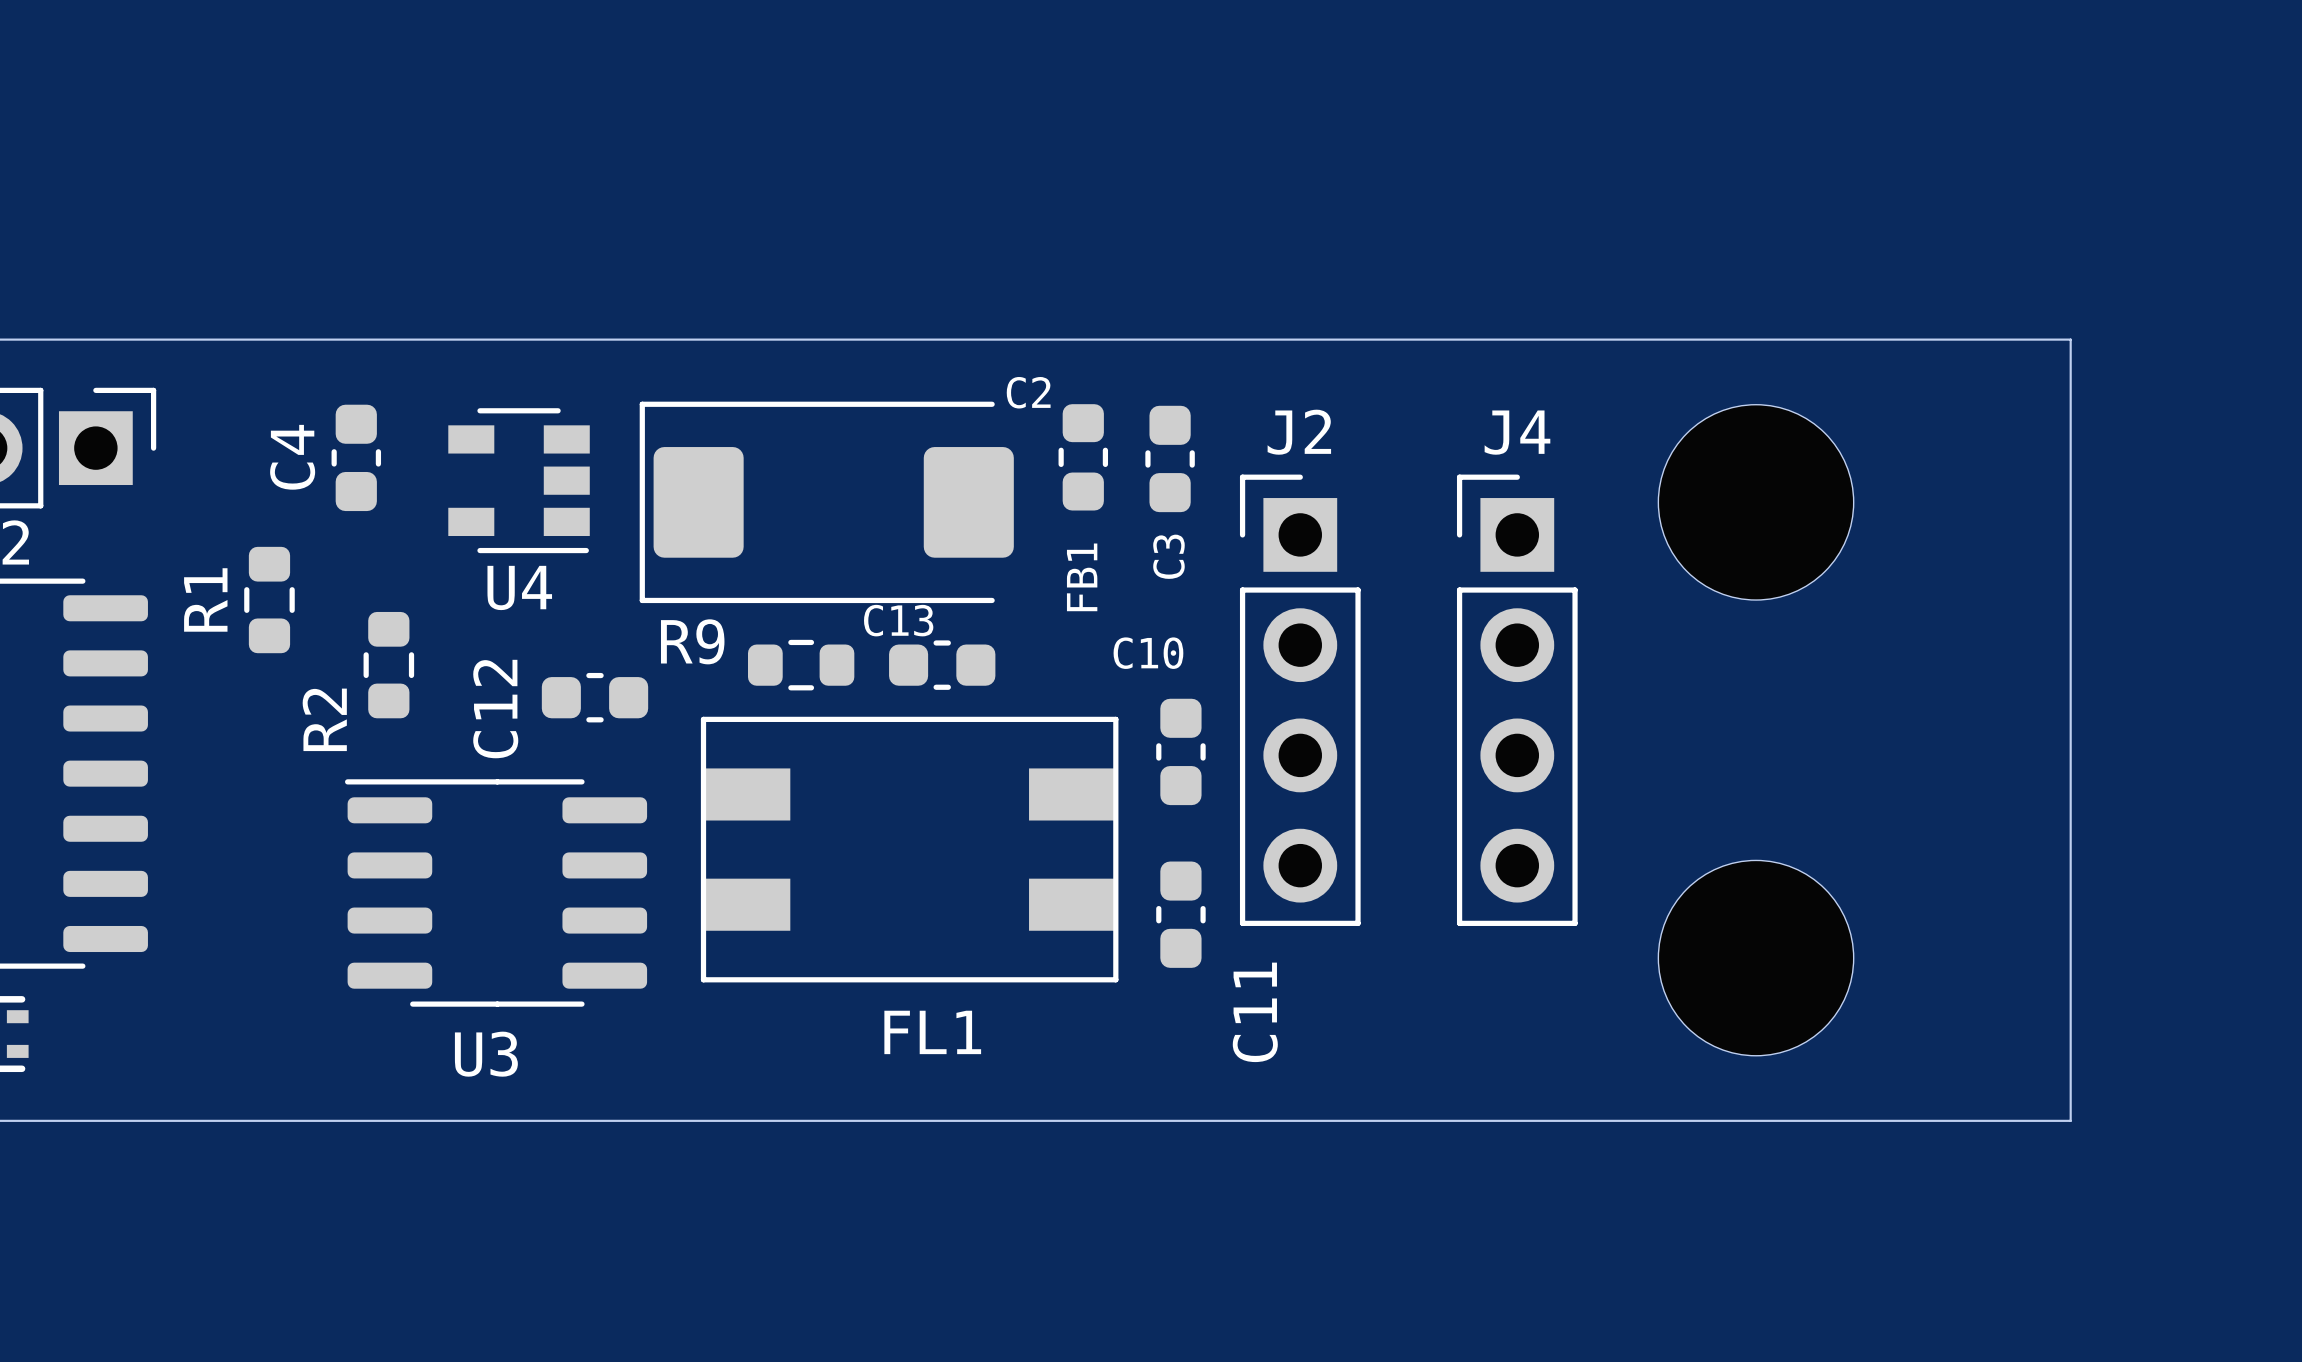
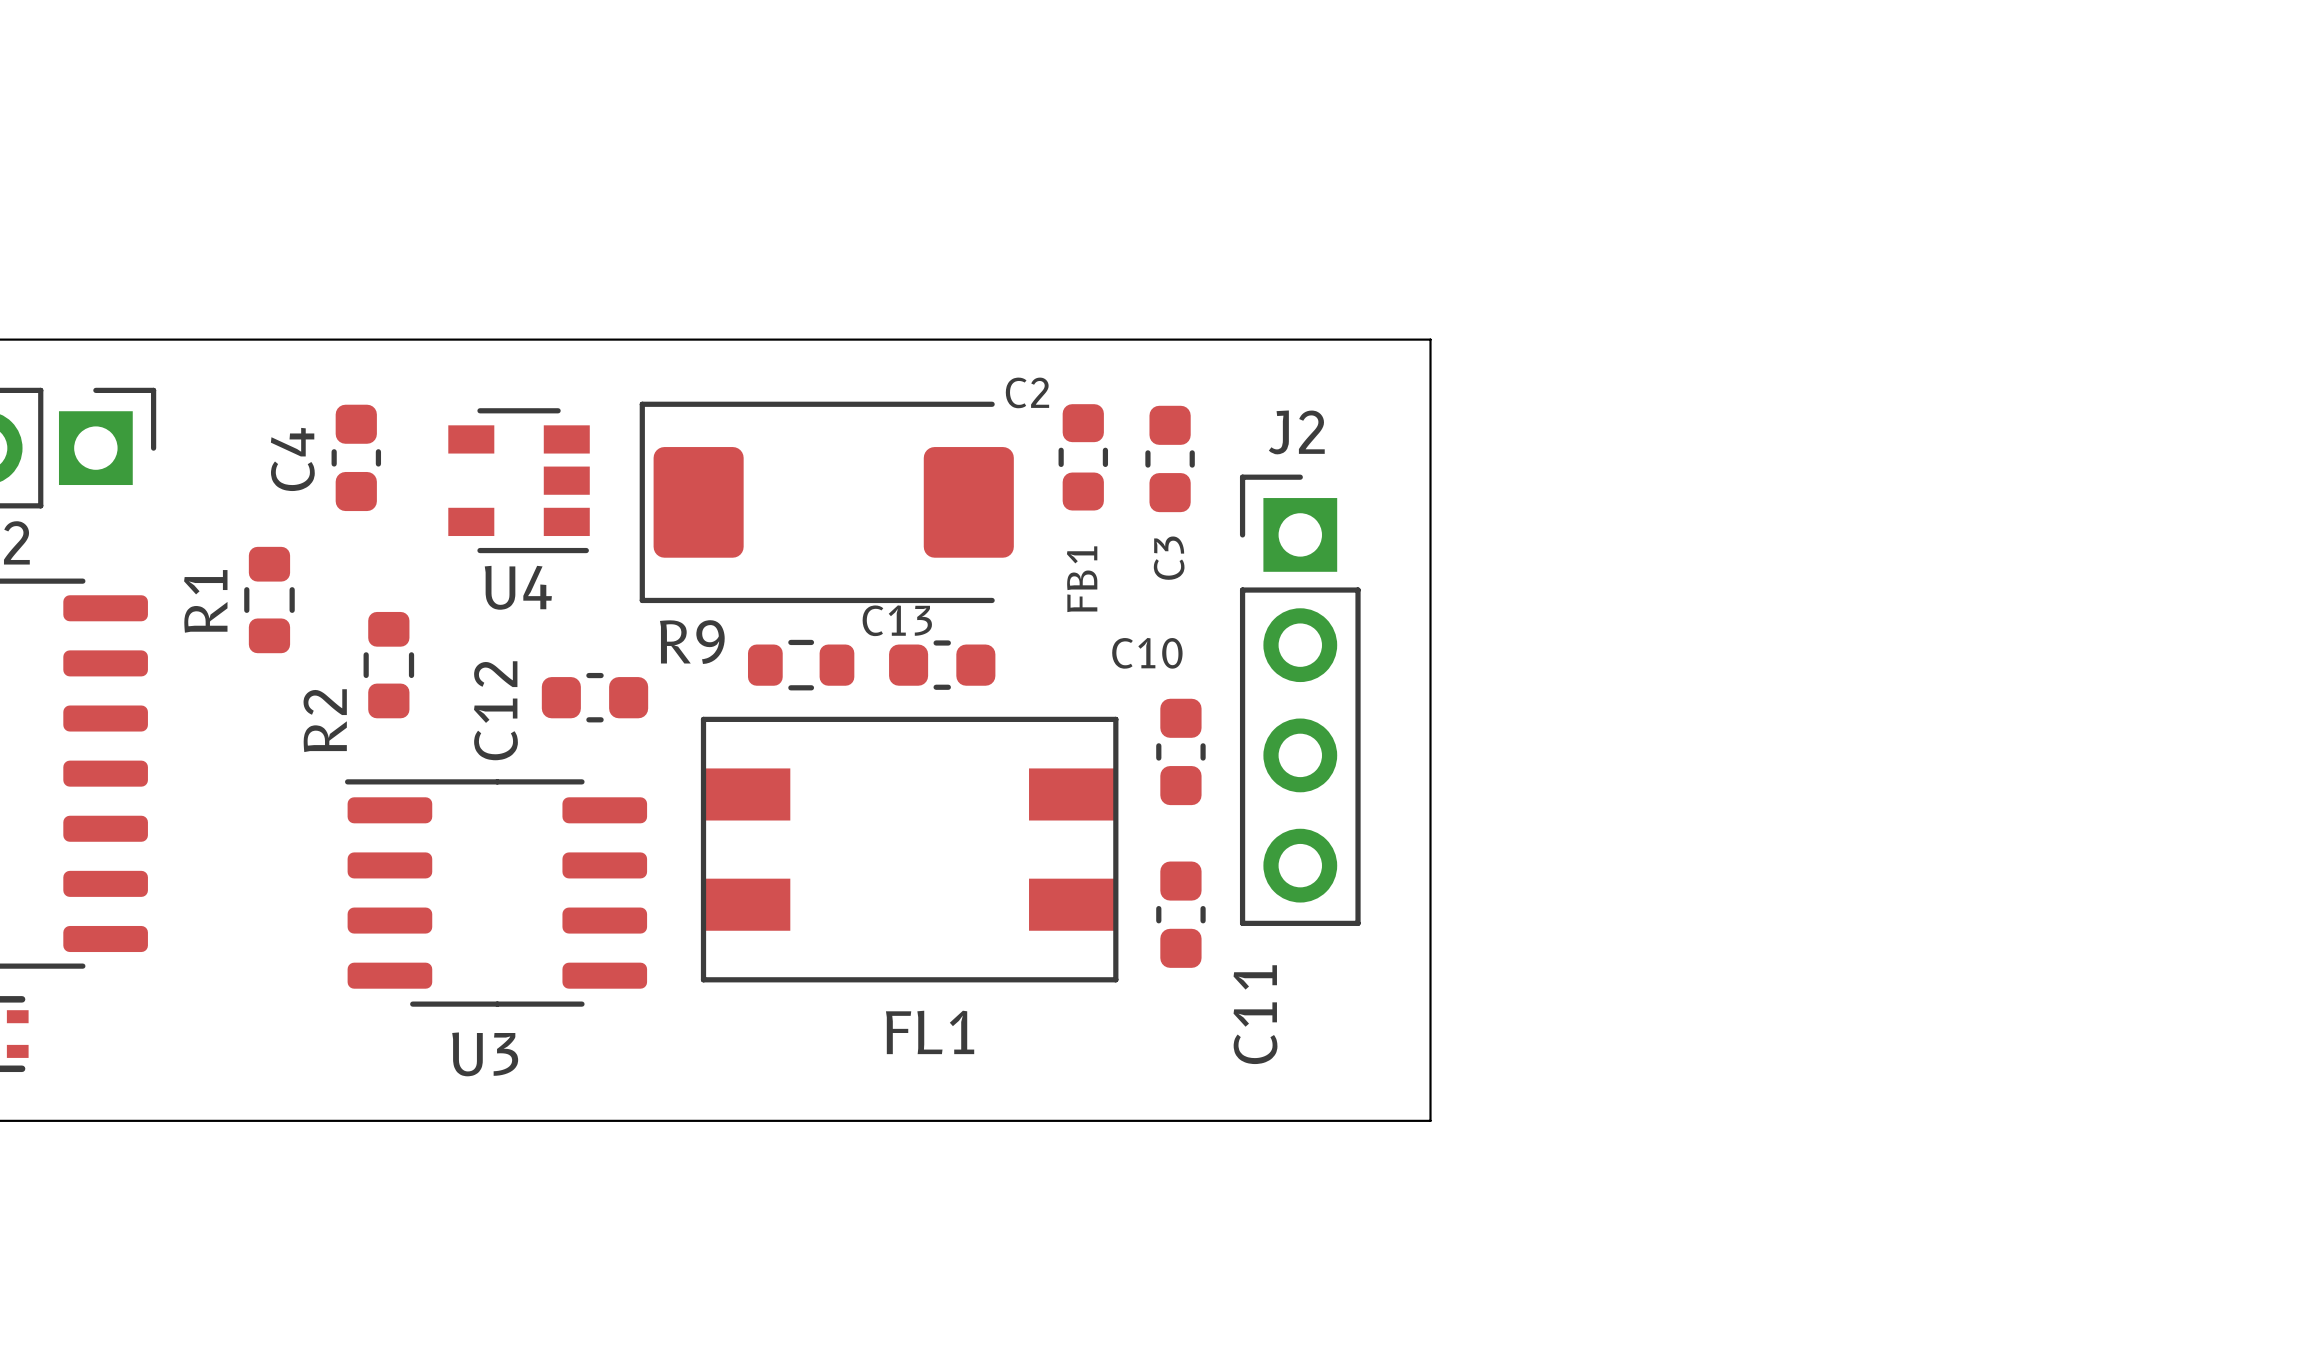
board edge: (1430, 339) (2070, 339) (2070, 1120) (1430, 1120) -> (1430, 339) (1430, 1120)
part: (1756, 502) -> none
J4: (1517, 700) -> none
part: (1756, 958) -> none

